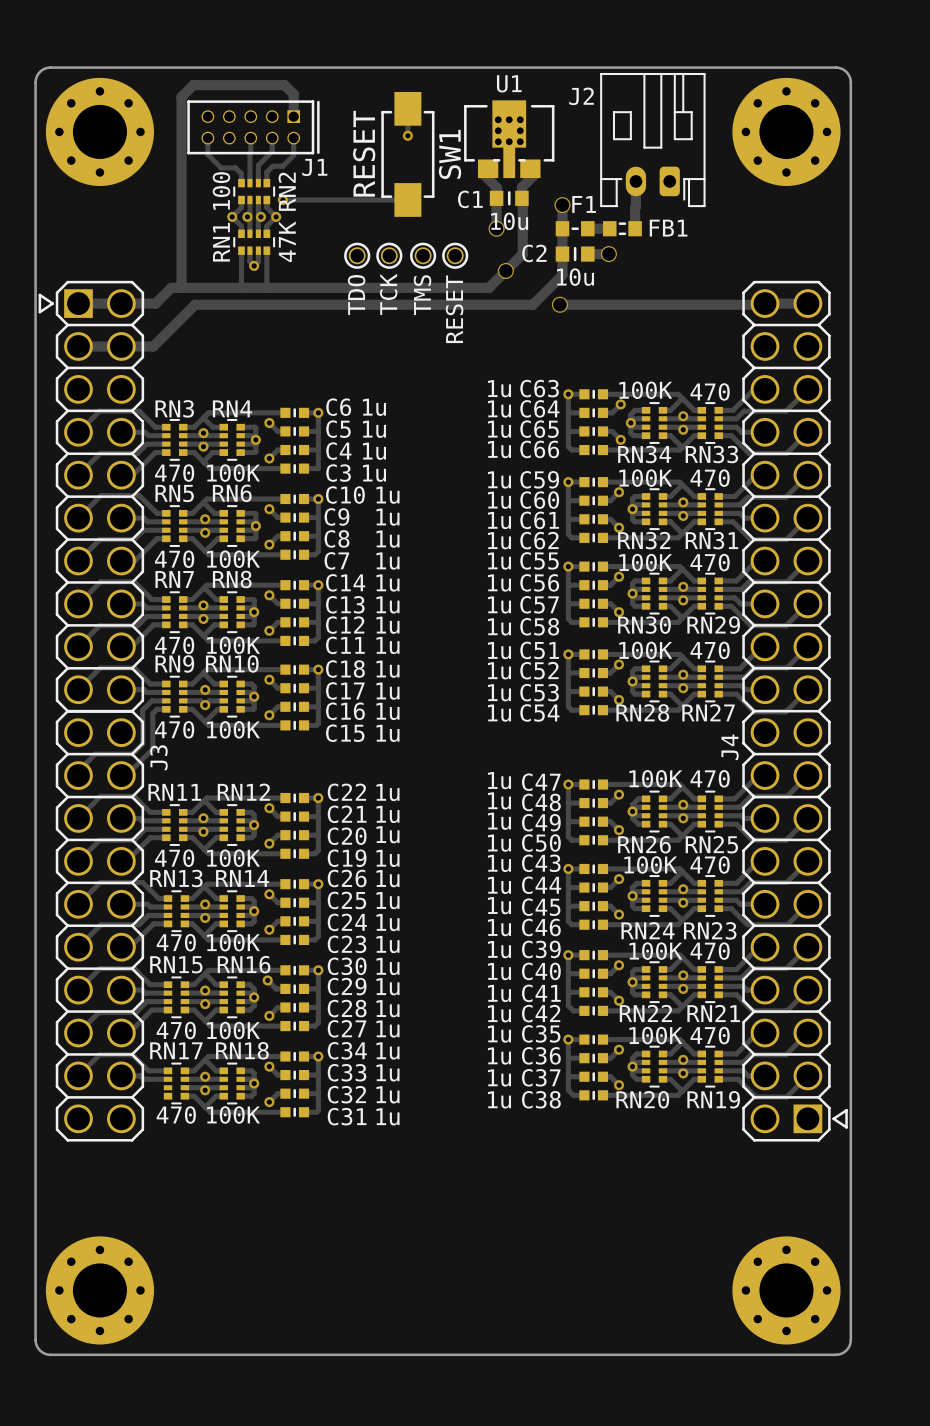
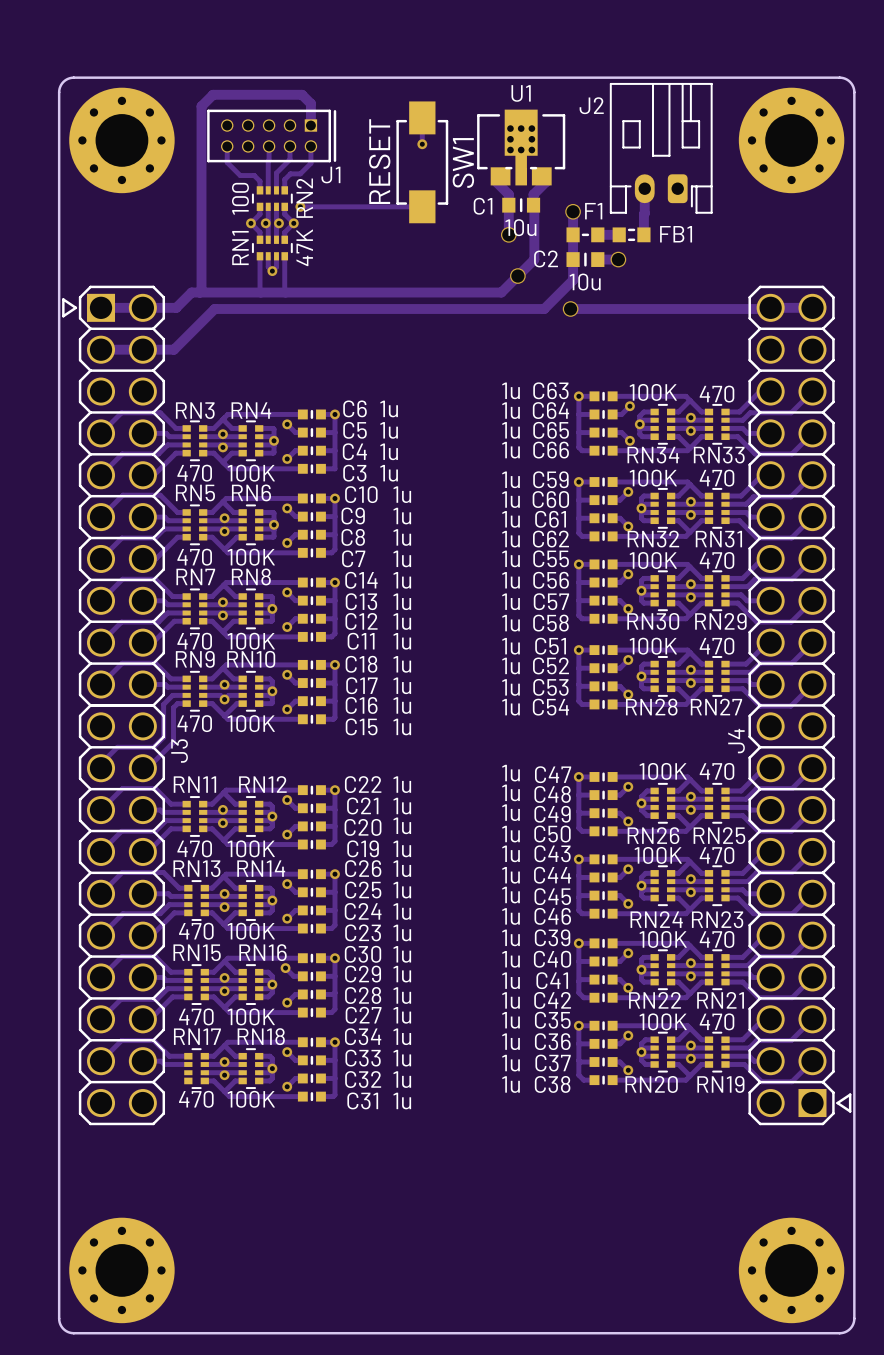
part: TDO (357, 255) -> none
part: TCK (389, 255) -> none
part: TMS (423, 255) -> none
part: RESET (455, 255) -> none

